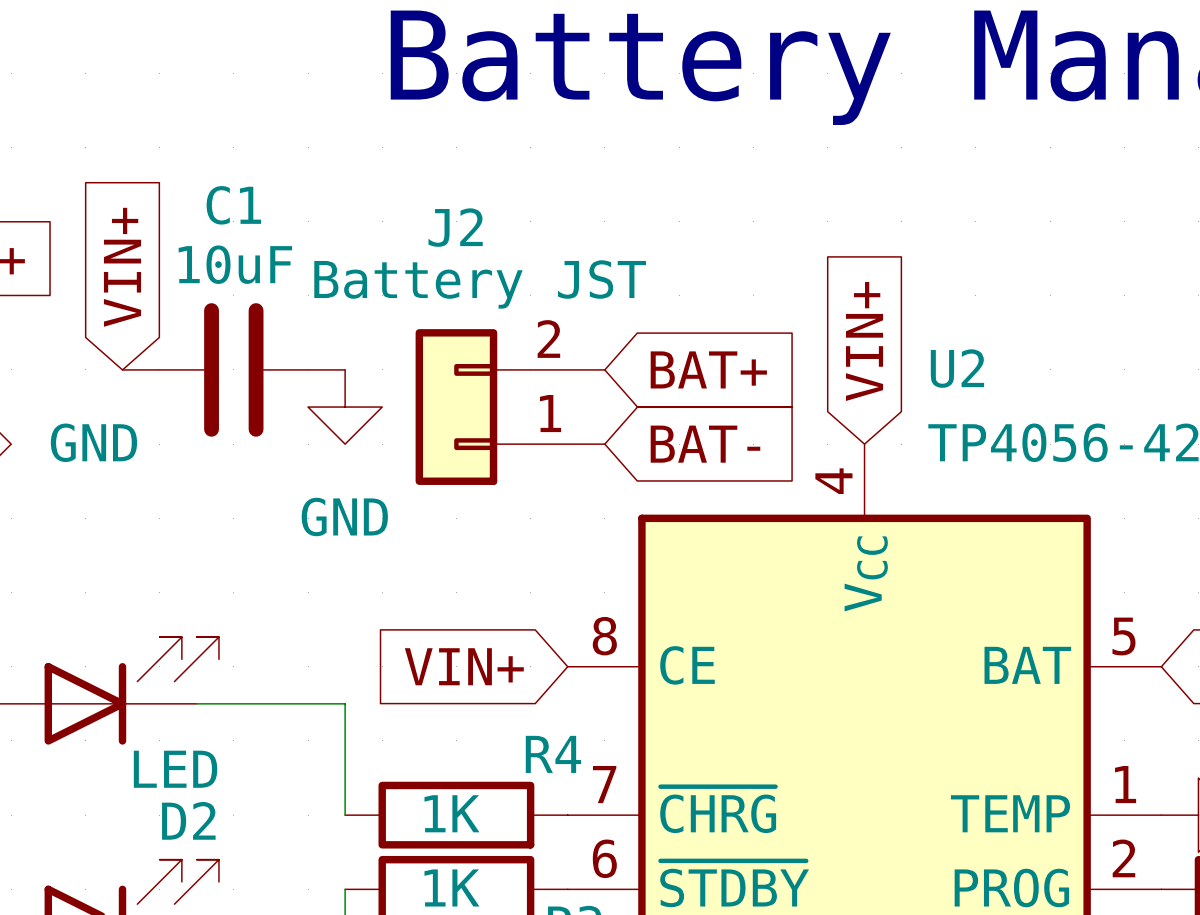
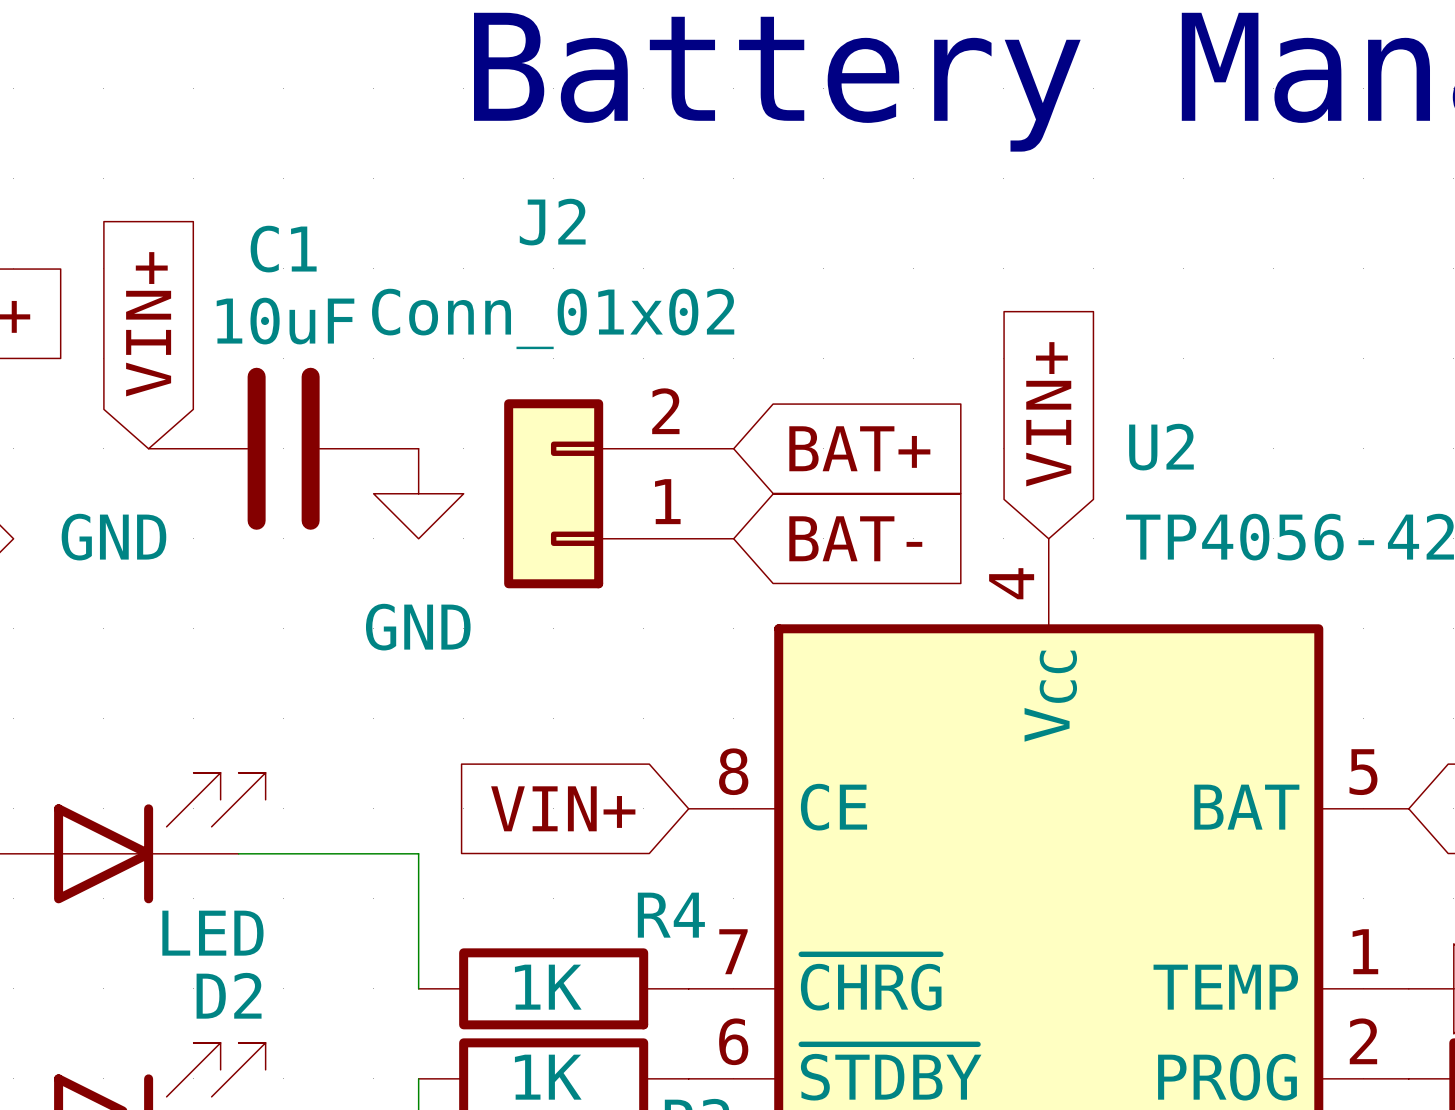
J2 name position: J2 (455, 227) -> J2 (552, 222)
J2 value: Battery JST (480, 284) -> Conn_01x02 (553, 318)

